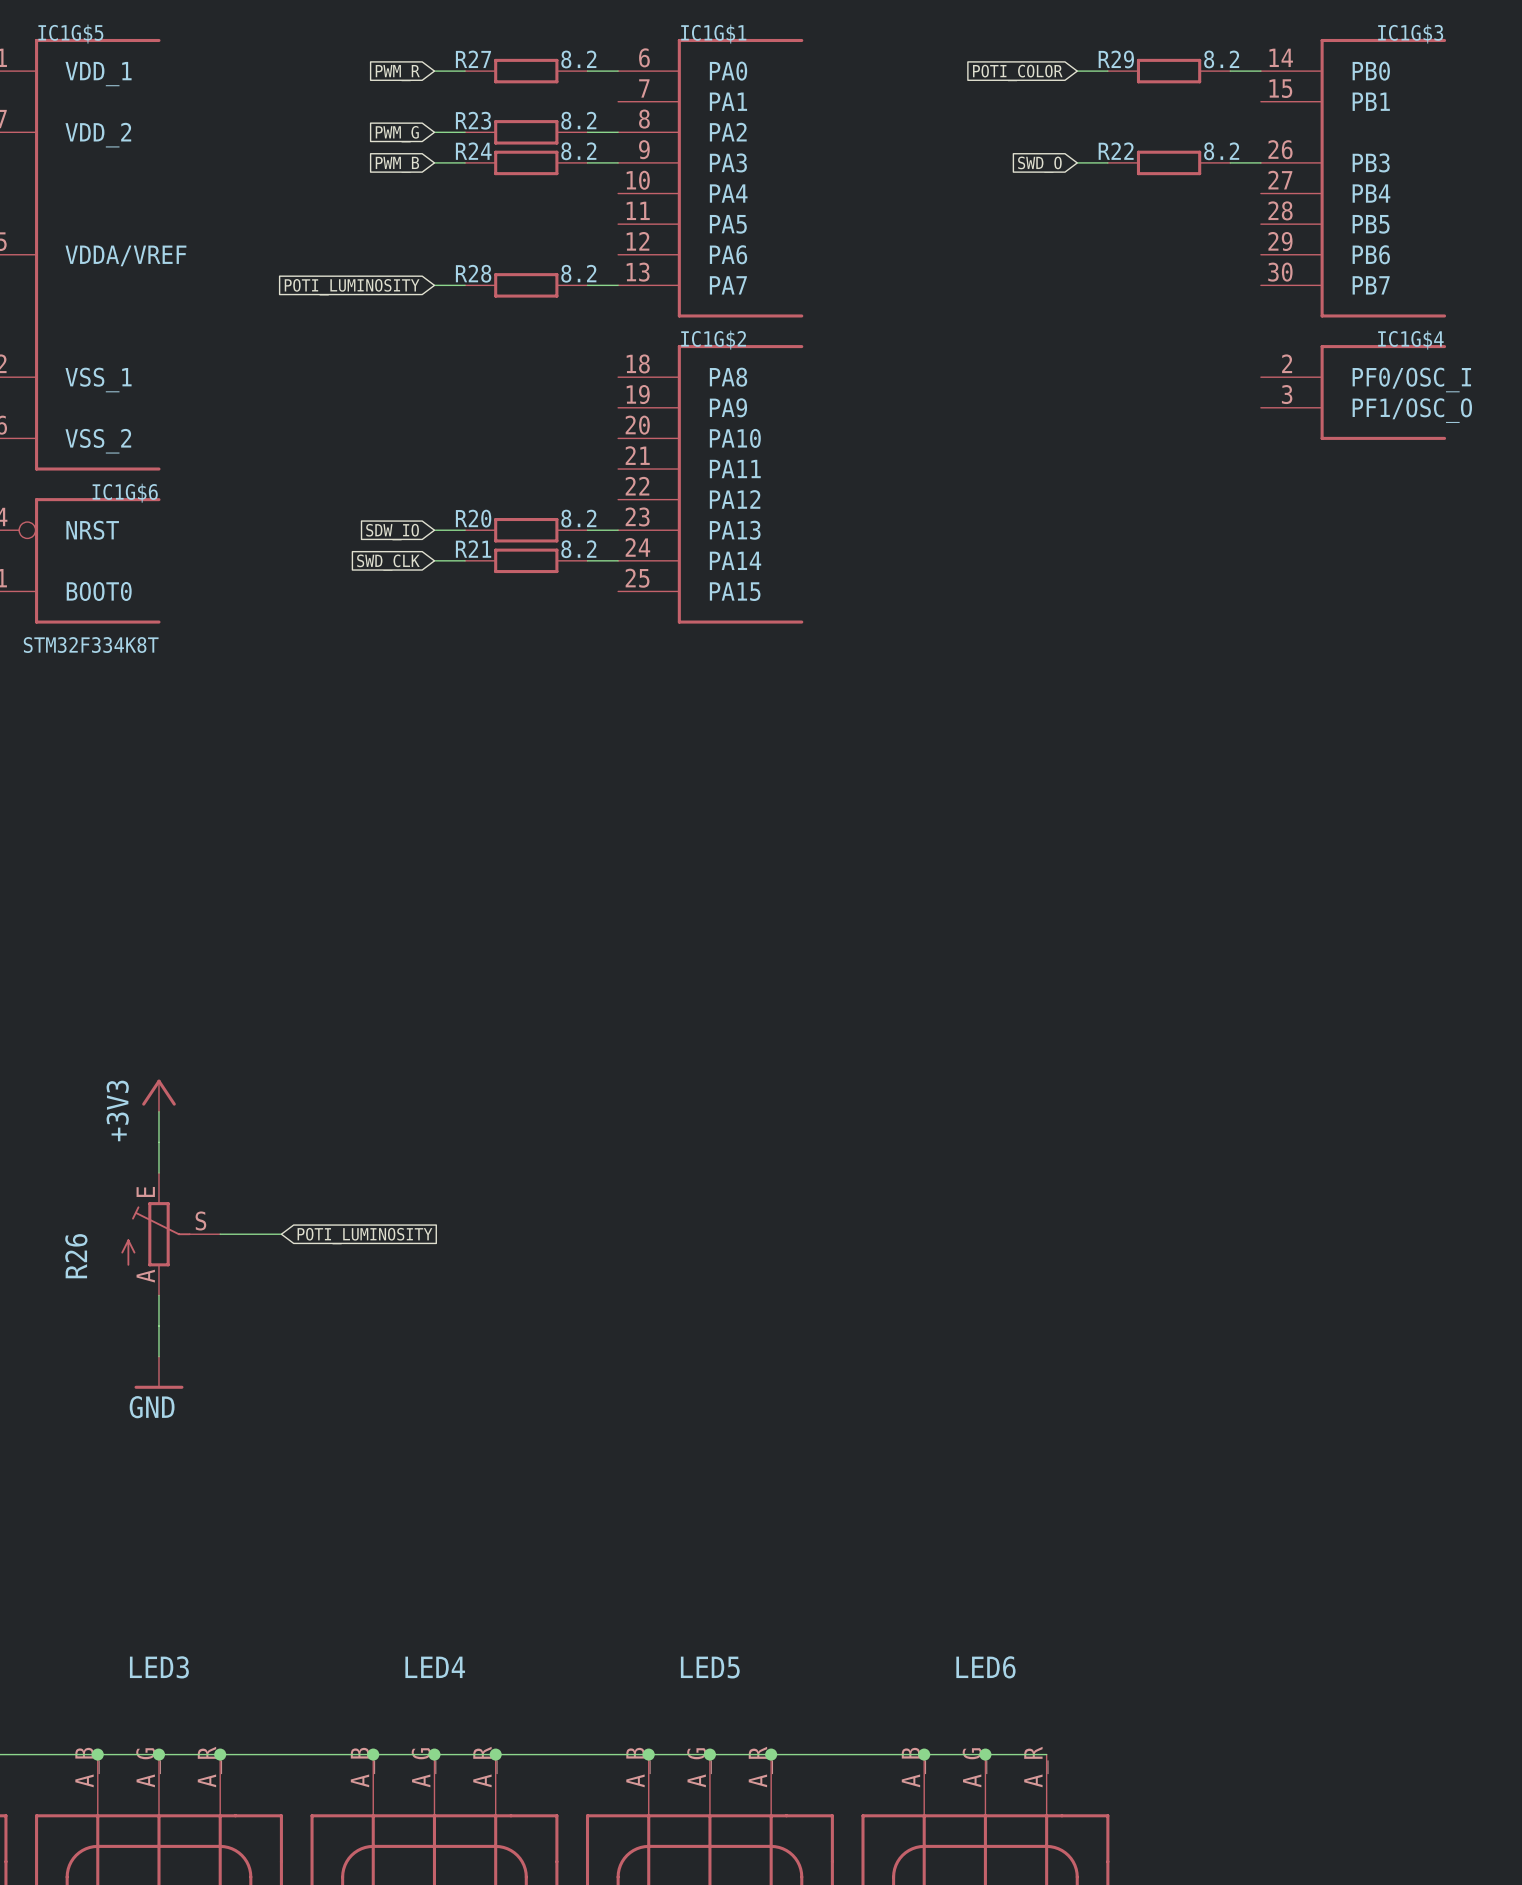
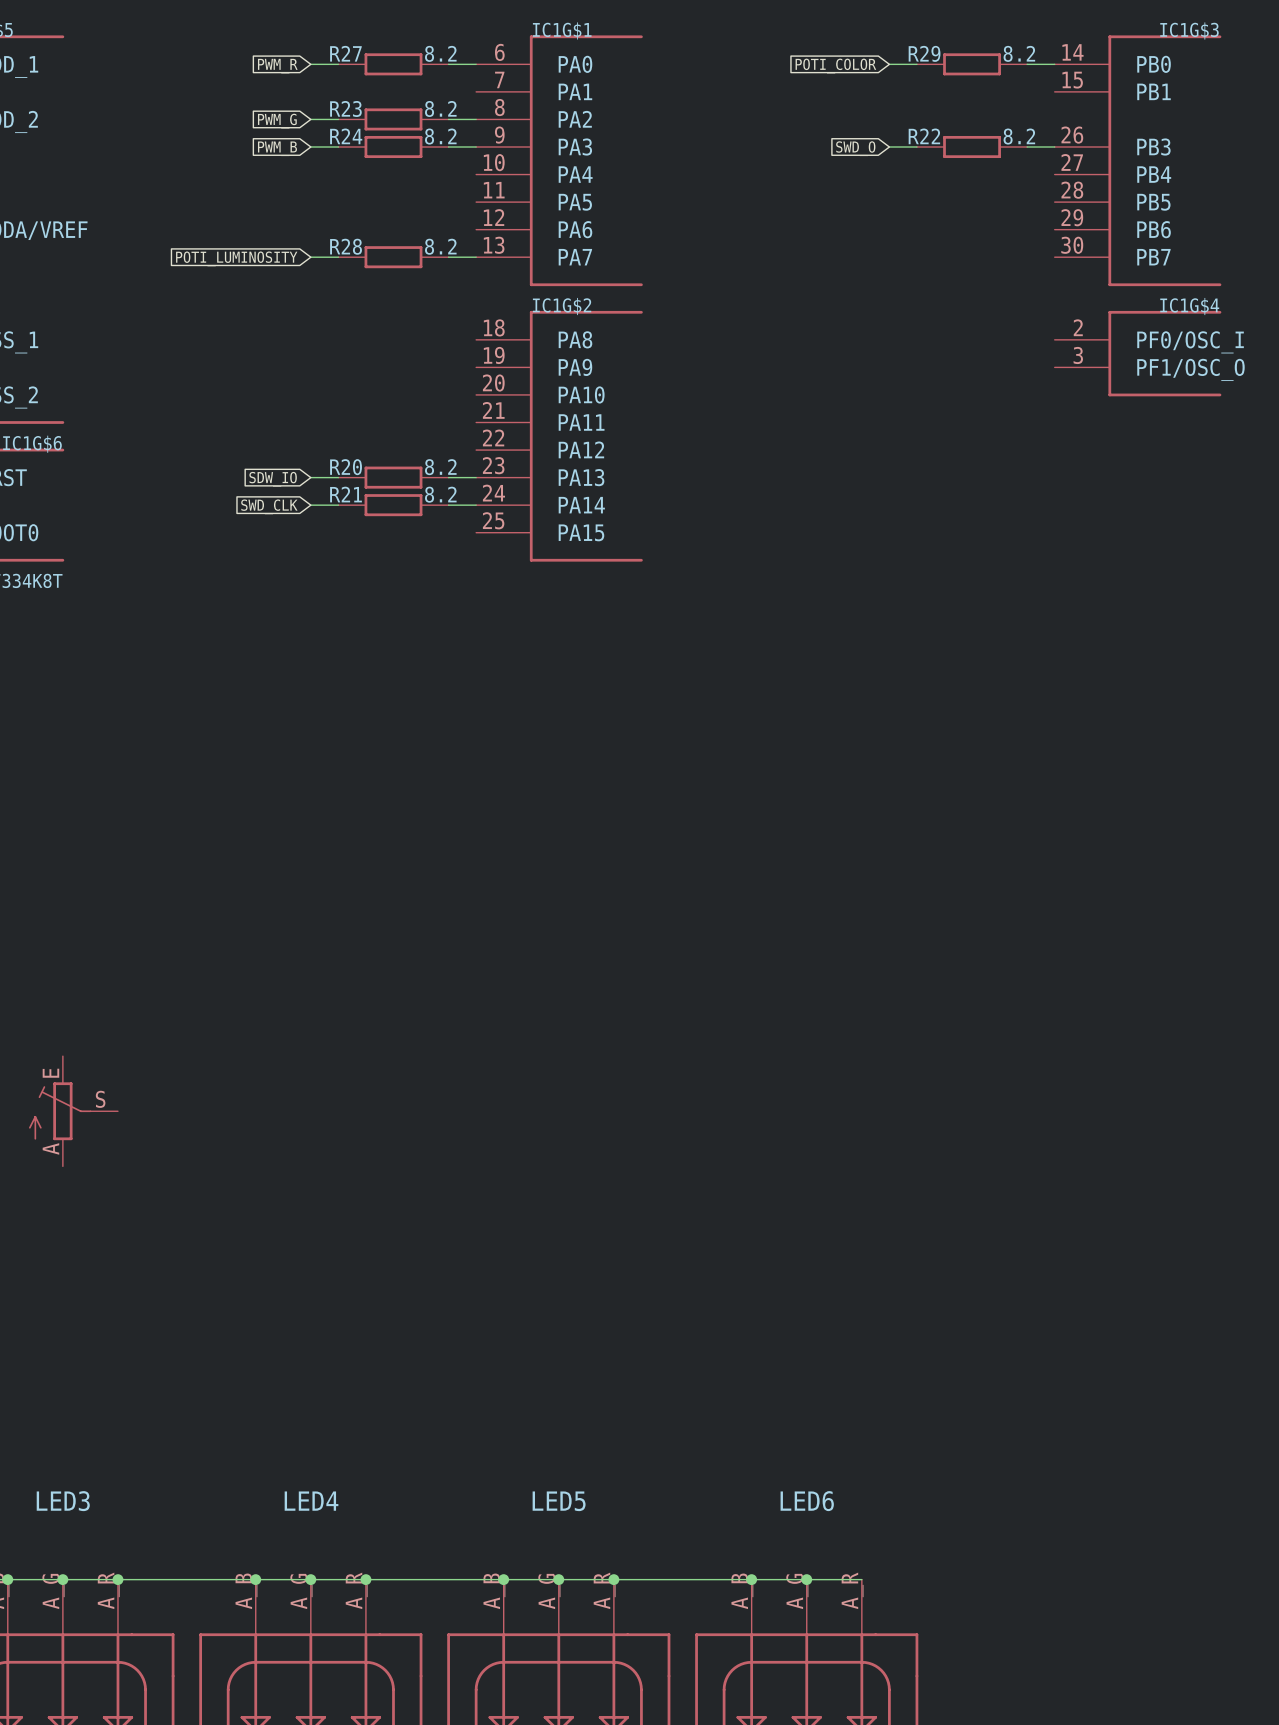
power symbol: +3V3 (158, 1095) -> none
wire: (158, 1111) (158, 1173) -> none
wire: (220, 1234) (281, 1234) -> none
global label: POTI_LUMINOSITY (364, 1236) -> none
wire: (158, 1295) (158, 1356) -> none
power symbol: GND (158, 1372) -> none

